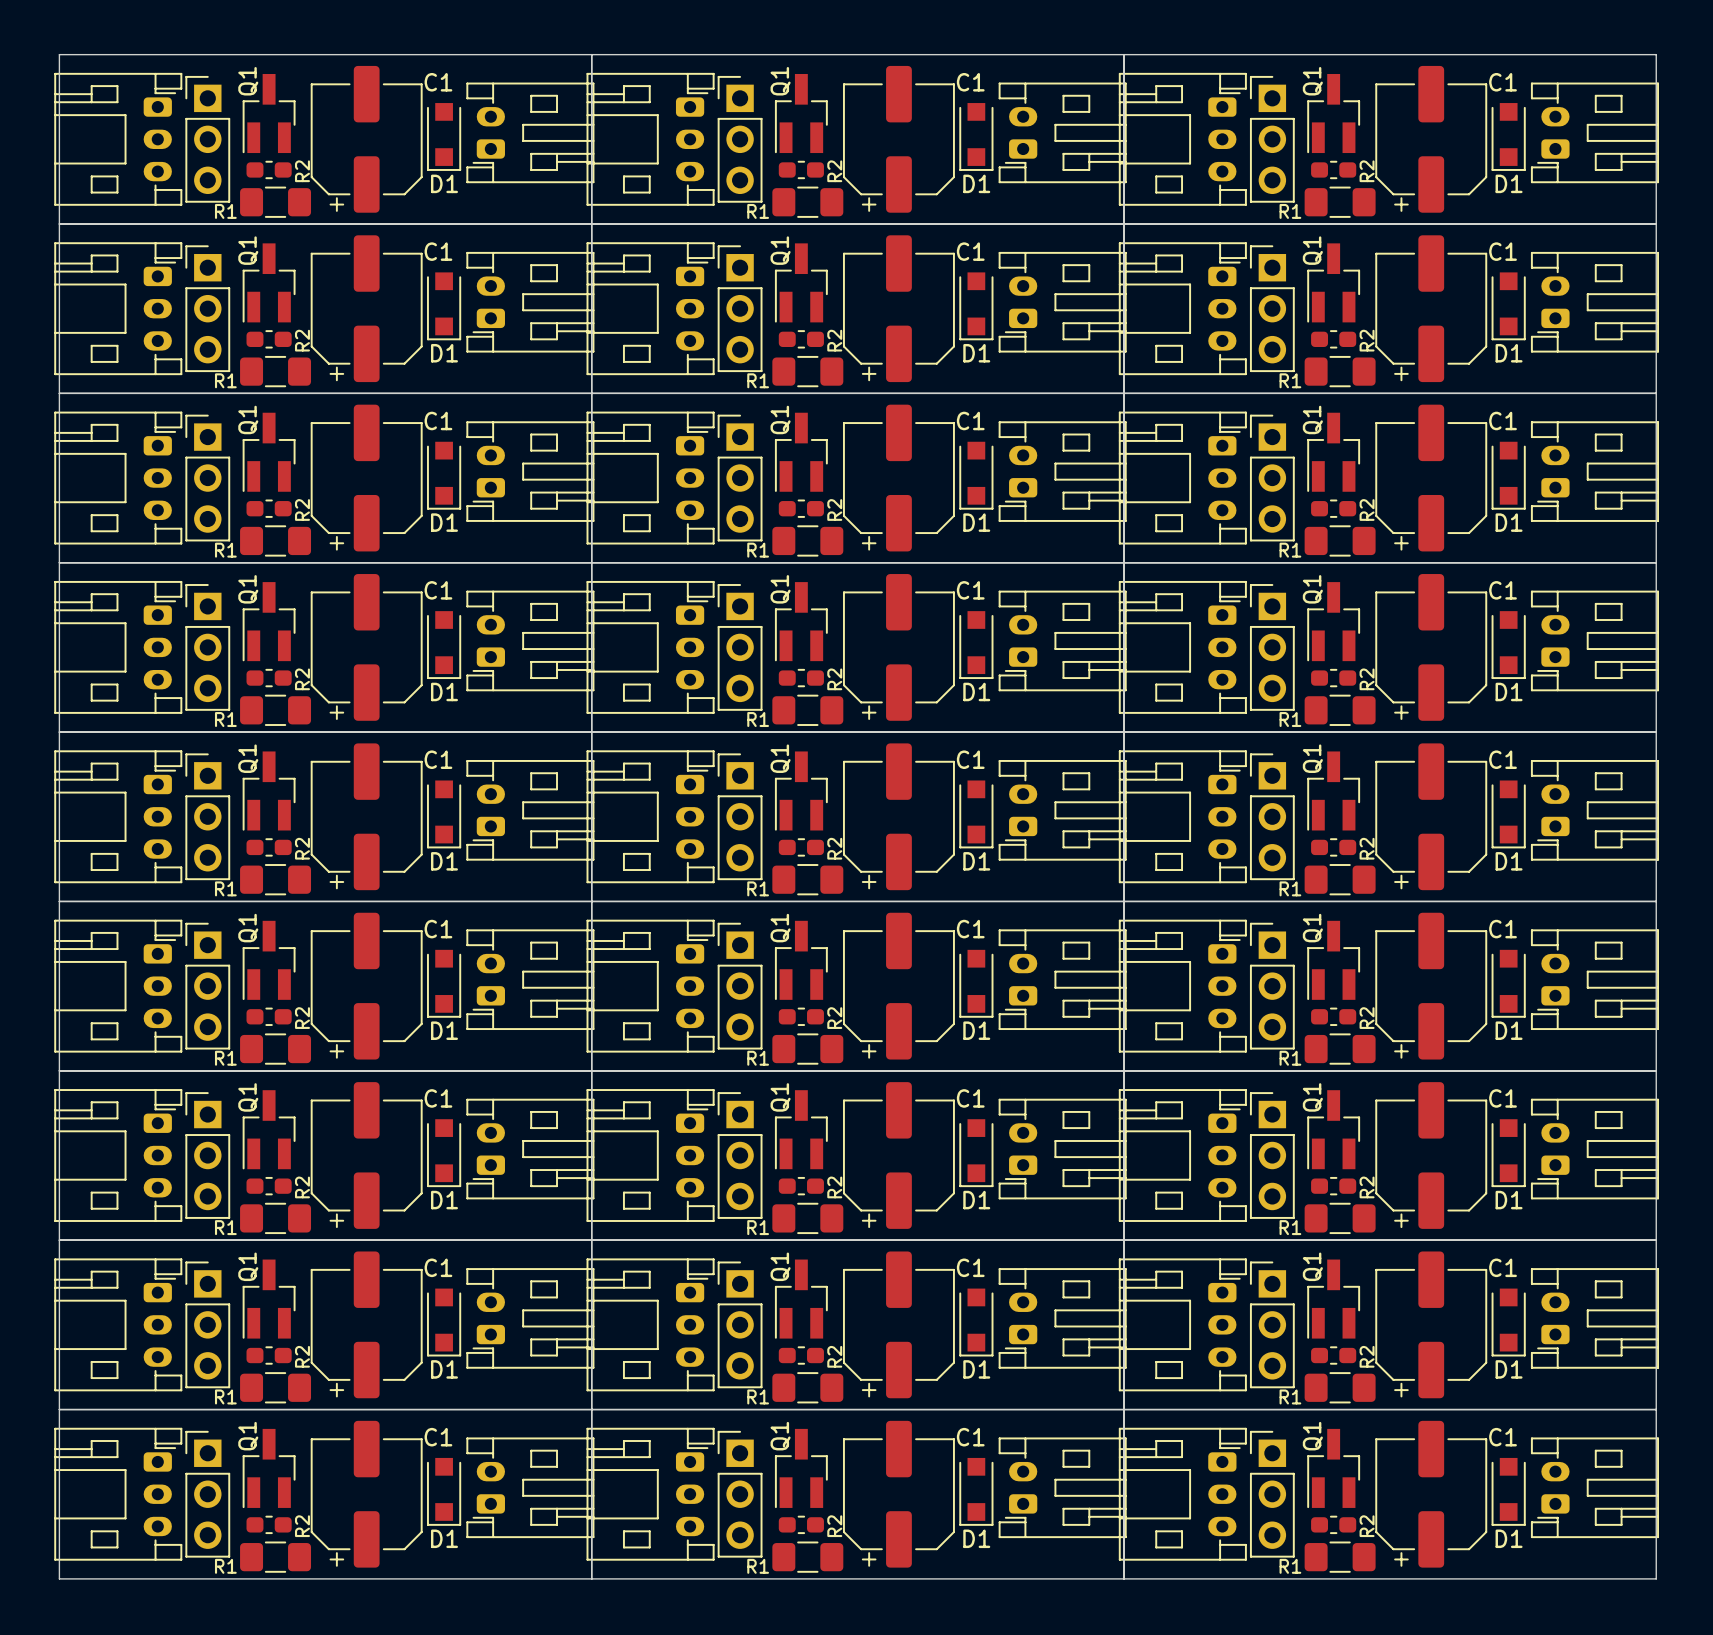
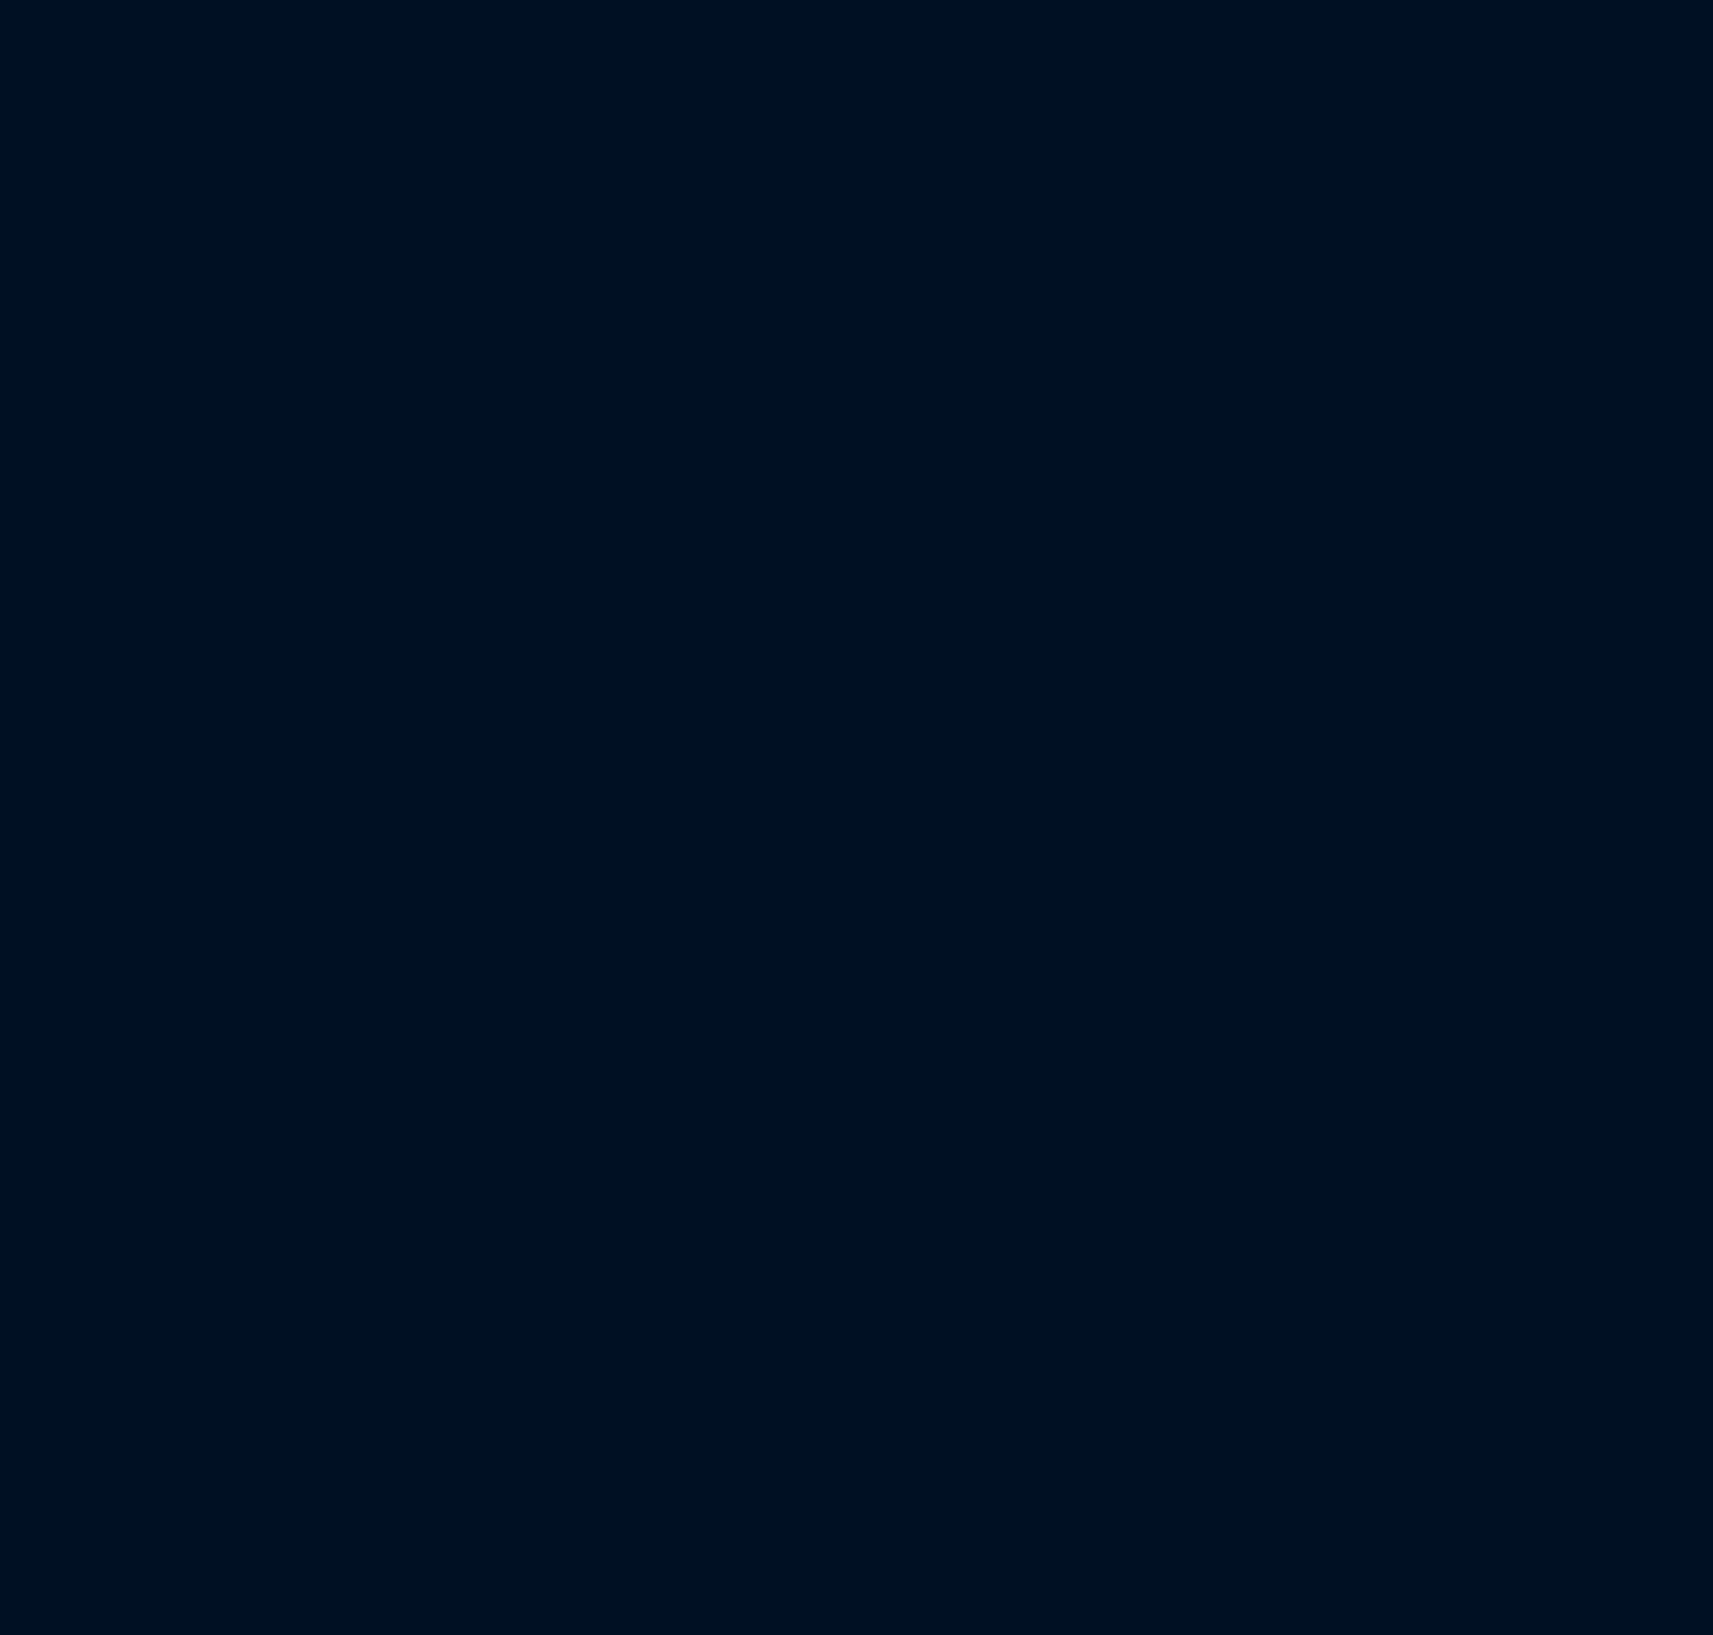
board edge: (59, 54) (59, 1578) (1656, 1578) (1656, 54) (59, 54) -> none
board edge: (591, 54) (591, 1578) -> none
board edge: (1123, 54) (1123, 1578) -> none
Q1: (269, 113) -> none
Q1: (801, 113) -> none
Q1: (1333, 113) -> none
part: (530, 132) -> none
part: (1062, 132) -> none
part: (1594, 132) -> none
D1: (444, 136) -> none
D1: (976, 136) -> none
D1: (1508, 136) -> none
part: (118, 139) -> none
part: (207, 139) -> none
C1: (366, 139) -> none
part: (650, 139) -> none
part: (740, 139) -> none
C1: (898, 139) -> none
part: (1182, 139) -> none
part: (1272, 139) -> none
C1: (1431, 139) -> none
R2: (269, 169) -> none
R2: (801, 169) -> none
R2: (1333, 169) -> none
R1: (275, 202) -> none
R1: (807, 202) -> none
R1: (1340, 202) -> none
board edge: (59, 224) (1656, 224) -> none
Q1: (269, 282) -> none
Q1: (801, 282) -> none
Q1: (1333, 282) -> none
part: (530, 302) -> none
part: (1062, 302) -> none
part: (1594, 302) -> none
D1: (444, 306) -> none
D1: (976, 306) -> none
D1: (1508, 306) -> none
part: (118, 308) -> none
part: (207, 308) -> none
C1: (366, 308) -> none
part: (650, 308) -> none
part: (740, 308) -> none
C1: (898, 308) -> none
part: (1182, 308) -> none
part: (1272, 308) -> none
C1: (1431, 308) -> none
R2: (269, 339) -> none
R2: (801, 339) -> none
R2: (1333, 339) -> none
R1: (275, 371) -> none
R1: (807, 371) -> none
R1: (1340, 371) -> none
board edge: (59, 393) (1656, 393) -> none
Q1: (269, 452) -> none
Q1: (801, 452) -> none
Q1: (1333, 452) -> none
part: (530, 471) -> none
part: (1062, 471) -> none
part: (1594, 471) -> none
D1: (444, 475) -> none
D1: (976, 475) -> none
D1: (1508, 475) -> none
part: (118, 478) -> none
part: (207, 478) -> none
C1: (366, 478) -> none
part: (650, 478) -> none
part: (740, 478) -> none
C1: (898, 478) -> none
part: (1182, 478) -> none
part: (1272, 478) -> none
C1: (1431, 478) -> none
R2: (269, 508) -> none
R2: (801, 508) -> none
R2: (1333, 508) -> none
R1: (275, 540) -> none
R1: (807, 540) -> none
R1: (1340, 540) -> none
board edge: (59, 562) (1656, 562) -> none
Q1: (269, 621) -> none
Q1: (801, 621) -> none
Q1: (1333, 621) -> none
part: (530, 640) -> none
part: (1062, 640) -> none
part: (1594, 640) -> none
D1: (444, 645) -> none
D1: (976, 645) -> none
D1: (1508, 645) -> none
part: (118, 647) -> none
part: (207, 647) -> none
C1: (366, 647) -> none
part: (650, 647) -> none
part: (740, 647) -> none
C1: (898, 647) -> none
part: (1182, 647) -> none
part: (1272, 647) -> none
C1: (1431, 647) -> none
R2: (269, 678) -> none
R2: (801, 678) -> none
R2: (1333, 678) -> none
R1: (275, 710) -> none
R1: (807, 710) -> none
R1: (1340, 710) -> none
board edge: (59, 732) (1656, 732) -> none
Q1: (269, 791) -> none
Q1: (801, 791) -> none
Q1: (1333, 791) -> none
part: (530, 810) -> none
part: (1062, 810) -> none
part: (1594, 810) -> none
D1: (444, 814) -> none
D1: (976, 814) -> none
D1: (1508, 814) -> none
part: (118, 816) -> none
part: (207, 816) -> none
C1: (366, 816) -> none
part: (650, 816) -> none
part: (740, 816) -> none
C1: (898, 816) -> none
part: (1182, 816) -> none
part: (1272, 816) -> none
C1: (1431, 816) -> none
R2: (269, 847) -> none
R2: (801, 847) -> none
R2: (1333, 847) -> none
R1: (275, 879) -> none
R1: (807, 879) -> none
R1: (1340, 879) -> none
board edge: (59, 901) (1656, 901) -> none
Q1: (269, 960) -> none
Q1: (801, 960) -> none
Q1: (1333, 960) -> none
part: (530, 979) -> none
part: (1062, 979) -> none
part: (1594, 979) -> none
D1: (444, 983) -> none
D1: (976, 983) -> none
D1: (1508, 983) -> none
part: (118, 986) -> none
part: (207, 986) -> none
C1: (366, 986) -> none
part: (650, 986) -> none
part: (740, 986) -> none
C1: (898, 986) -> none
part: (1182, 986) -> none
part: (1272, 986) -> none
C1: (1431, 986) -> none
R2: (269, 1016) -> none
R2: (801, 1016) -> none
R2: (1333, 1016) -> none
R1: (275, 1049) -> none
R1: (807, 1049) -> none
R1: (1340, 1049) -> none
board edge: (59, 1070) (1656, 1070) -> none
Q1: (269, 1129) -> none
Q1: (801, 1129) -> none
Q1: (1333, 1129) -> none
part: (530, 1149) -> none
part: (1062, 1149) -> none
part: (1594, 1149) -> none
D1: (444, 1153) -> none
D1: (976, 1153) -> none
D1: (1508, 1153) -> none
part: (118, 1155) -> none
part: (207, 1155) -> none
C1: (366, 1155) -> none
part: (650, 1155) -> none
part: (740, 1155) -> none
C1: (898, 1155) -> none
part: (1182, 1155) -> none
part: (1272, 1155) -> none
C1: (1431, 1155) -> none
R2: (269, 1186) -> none
R2: (801, 1186) -> none
R2: (1333, 1186) -> none
R1: (275, 1218) -> none
R1: (807, 1218) -> none
R1: (1340, 1218) -> none
board edge: (59, 1240) (1656, 1240) -> none
Q1: (269, 1299) -> none
Q1: (801, 1299) -> none
Q1: (1333, 1299) -> none
part: (530, 1318) -> none
part: (1062, 1318) -> none
part: (1594, 1318) -> none
D1: (444, 1322) -> none
D1: (976, 1322) -> none
D1: (1508, 1322) -> none
part: (118, 1324) -> none
part: (207, 1324) -> none
C1: (366, 1324) -> none
part: (650, 1324) -> none
part: (740, 1324) -> none
C1: (898, 1324) -> none
part: (1182, 1324) -> none
part: (1272, 1324) -> none
C1: (1431, 1324) -> none
R2: (269, 1355) -> none
R2: (801, 1355) -> none
R2: (1333, 1355) -> none
R1: (275, 1387) -> none
R1: (807, 1387) -> none
R1: (1340, 1387) -> none
board edge: (59, 1409) (1656, 1409) -> none
Q1: (269, 1468) -> none
Q1: (801, 1468) -> none
Q1: (1333, 1468) -> none
part: (530, 1487) -> none
part: (1062, 1487) -> none
part: (1594, 1487) -> none
D1: (444, 1491) -> none
D1: (976, 1491) -> none
D1: (1508, 1491) -> none
part: (118, 1494) -> none
part: (207, 1494) -> none
C1: (366, 1494) -> none
part: (650, 1494) -> none
part: (740, 1494) -> none
C1: (898, 1494) -> none
part: (1182, 1494) -> none
part: (1272, 1494) -> none
C1: (1431, 1494) -> none
R2: (269, 1524) -> none
R2: (801, 1524) -> none
R2: (1333, 1524) -> none
R1: (275, 1557) -> none
R1: (807, 1557) -> none
R1: (1340, 1557) -> none

